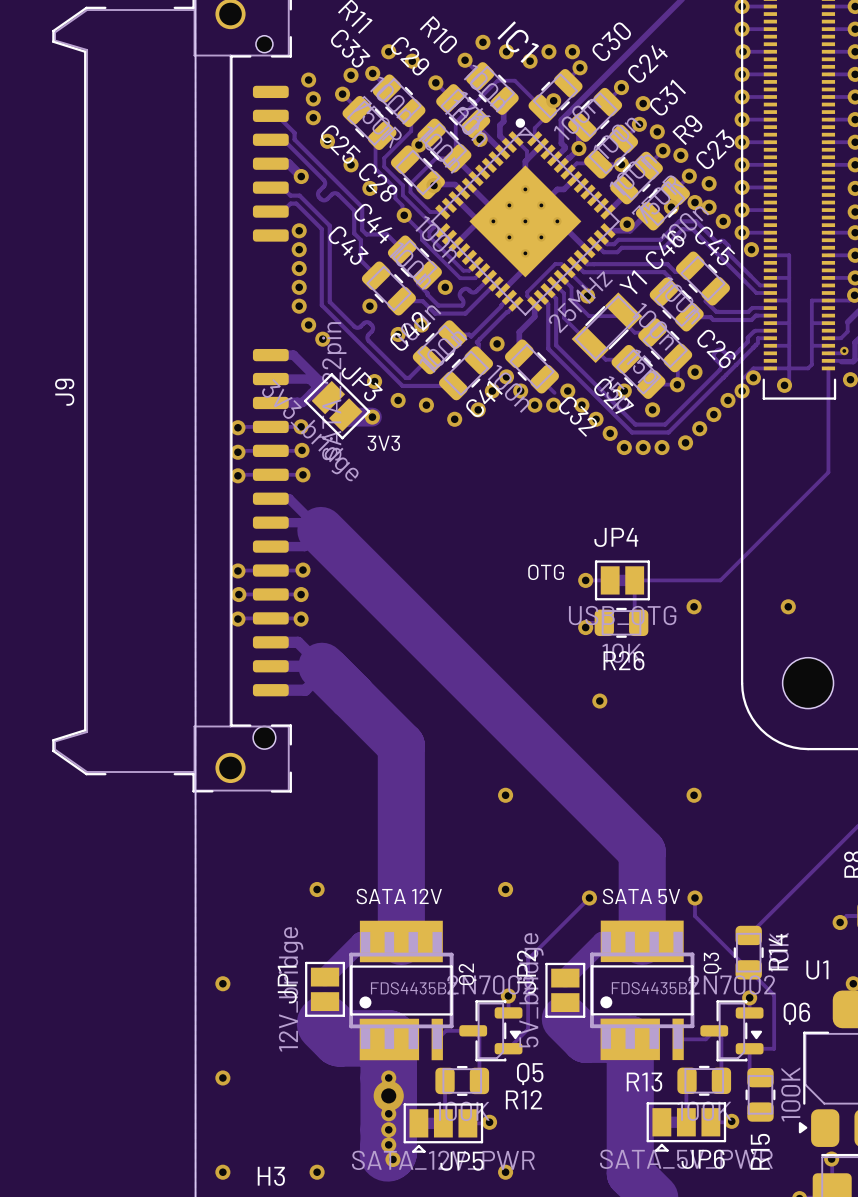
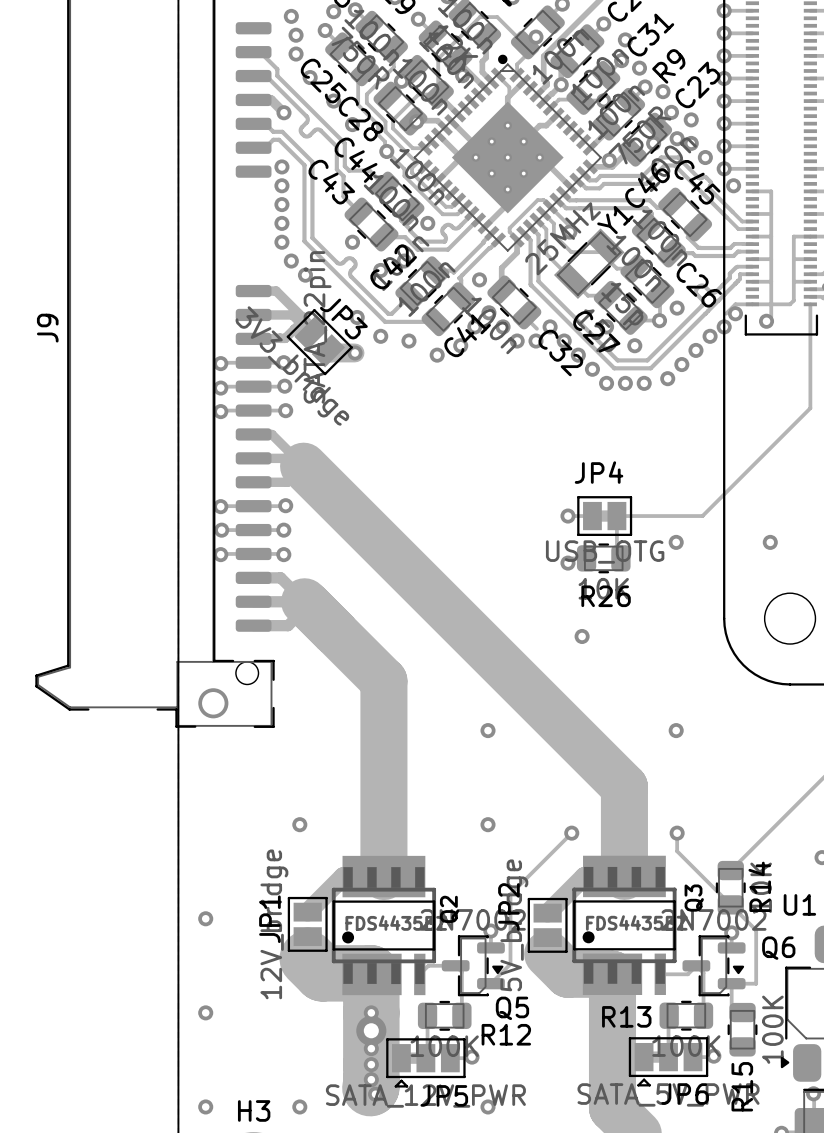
text: 3V3 (383, 443) -> none
text: OTG (546, 572) -> none
text: SATA 12V (399, 896) -> none
text: SATA 5V (641, 896) -> none

